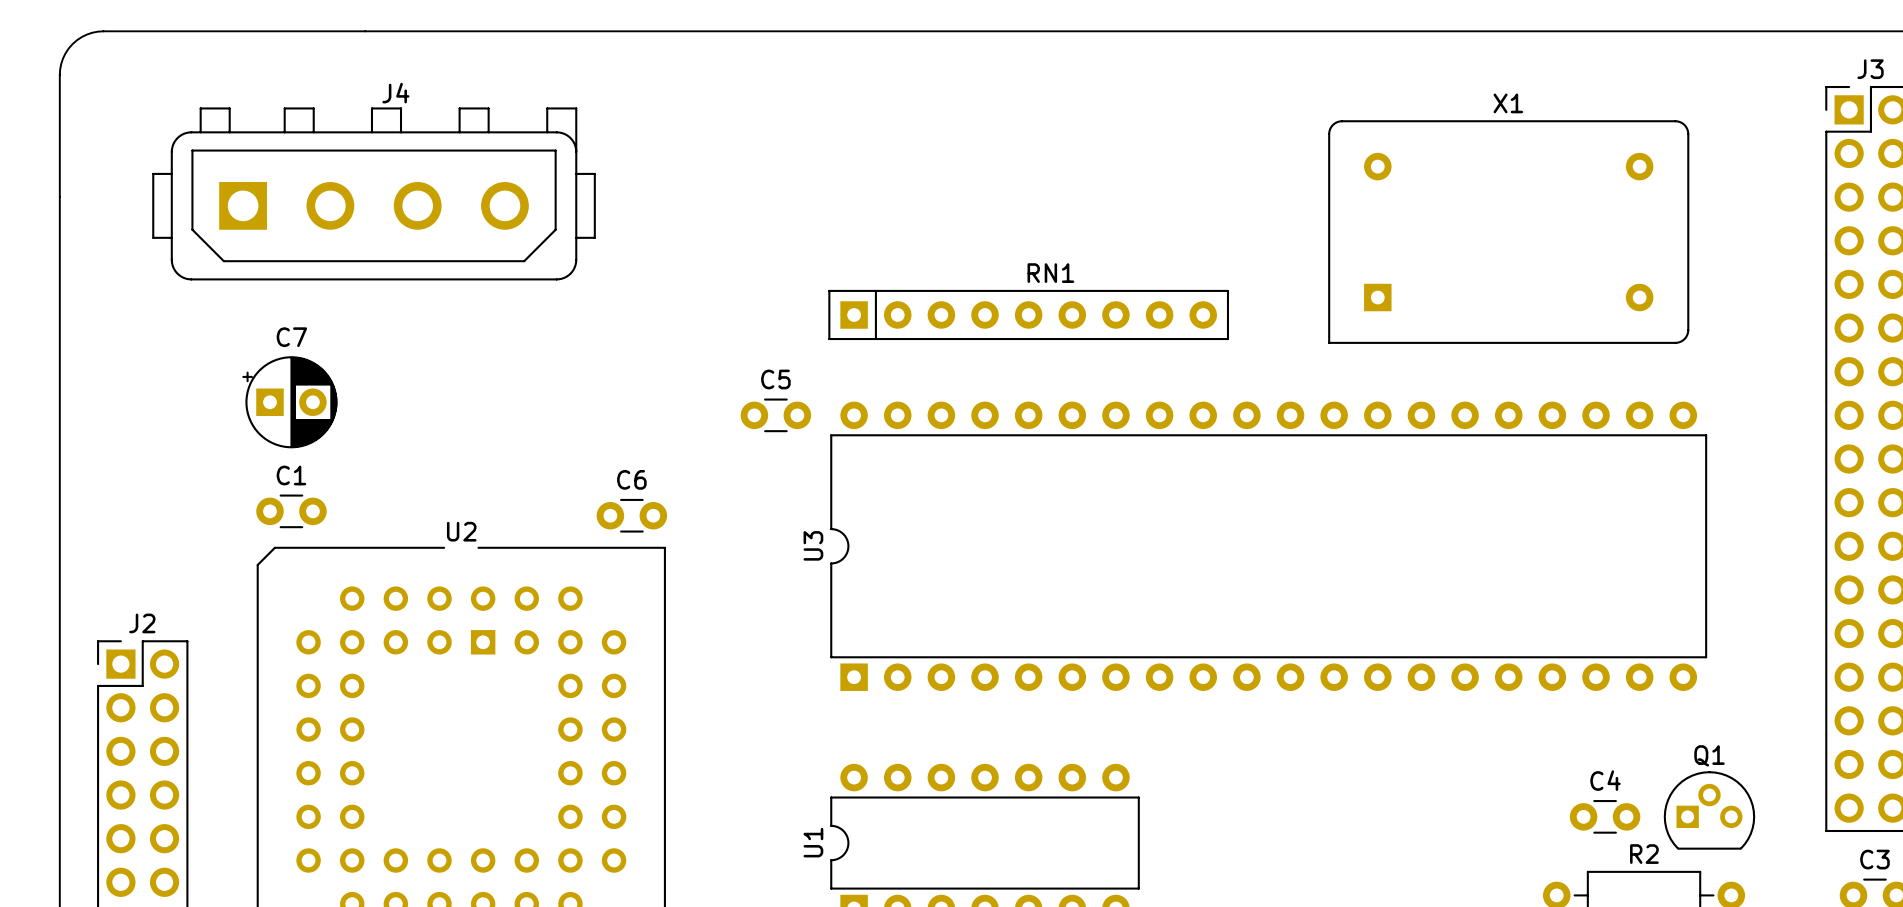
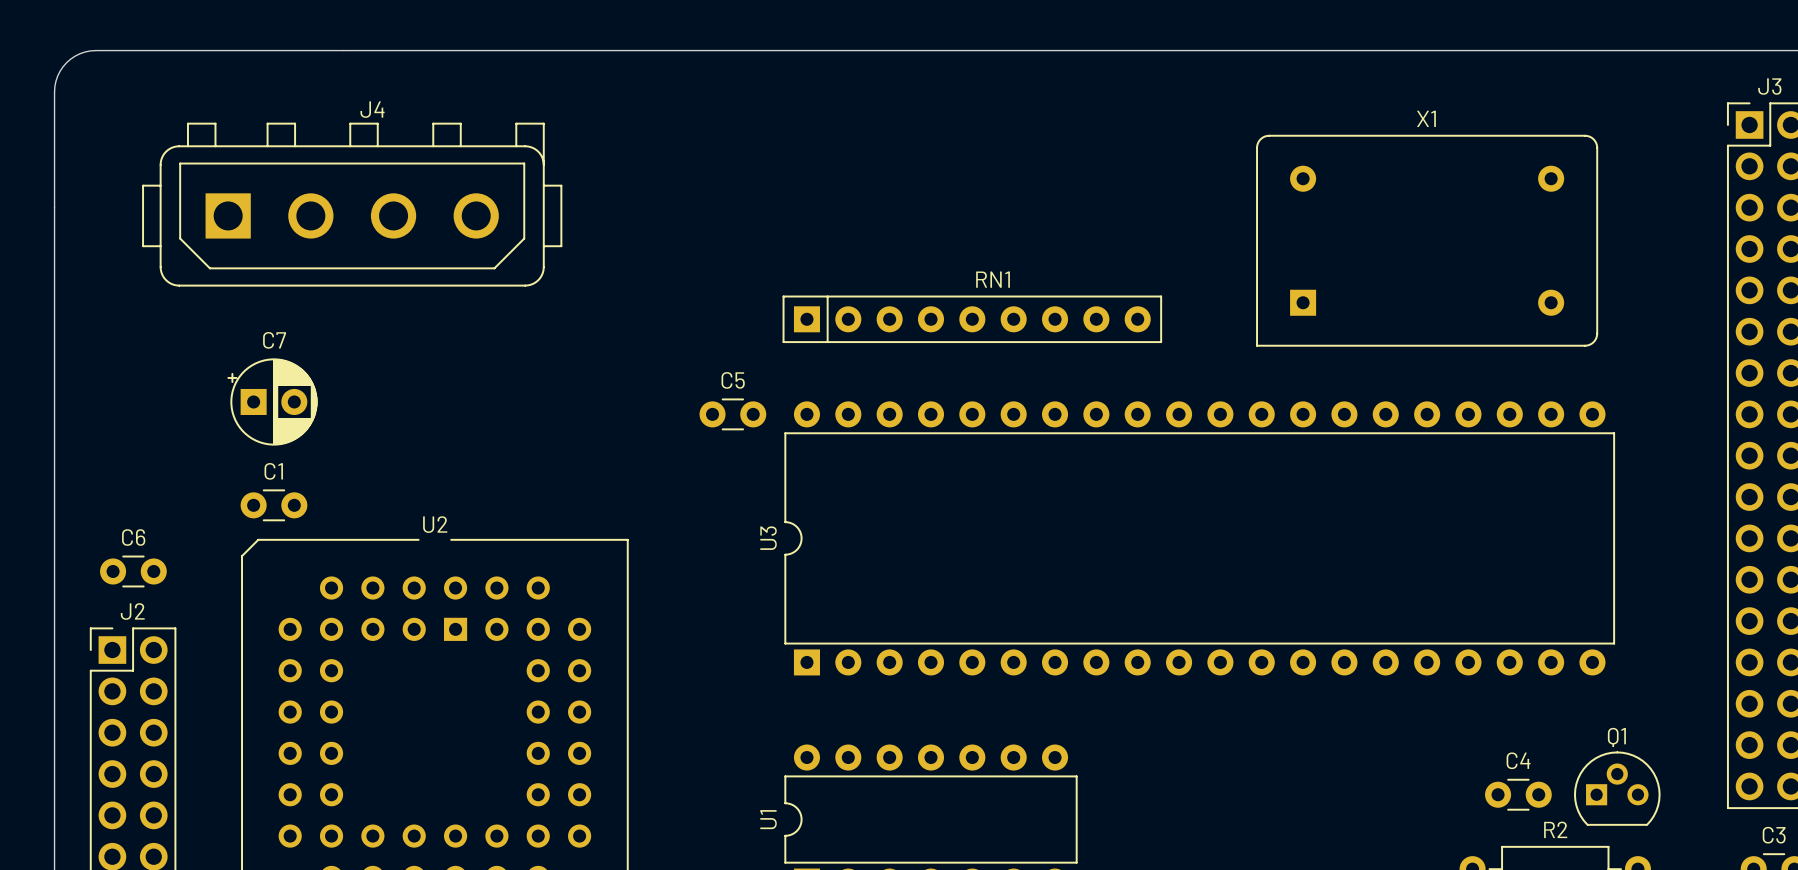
C6 position: (631, 515) -> (133, 571)

